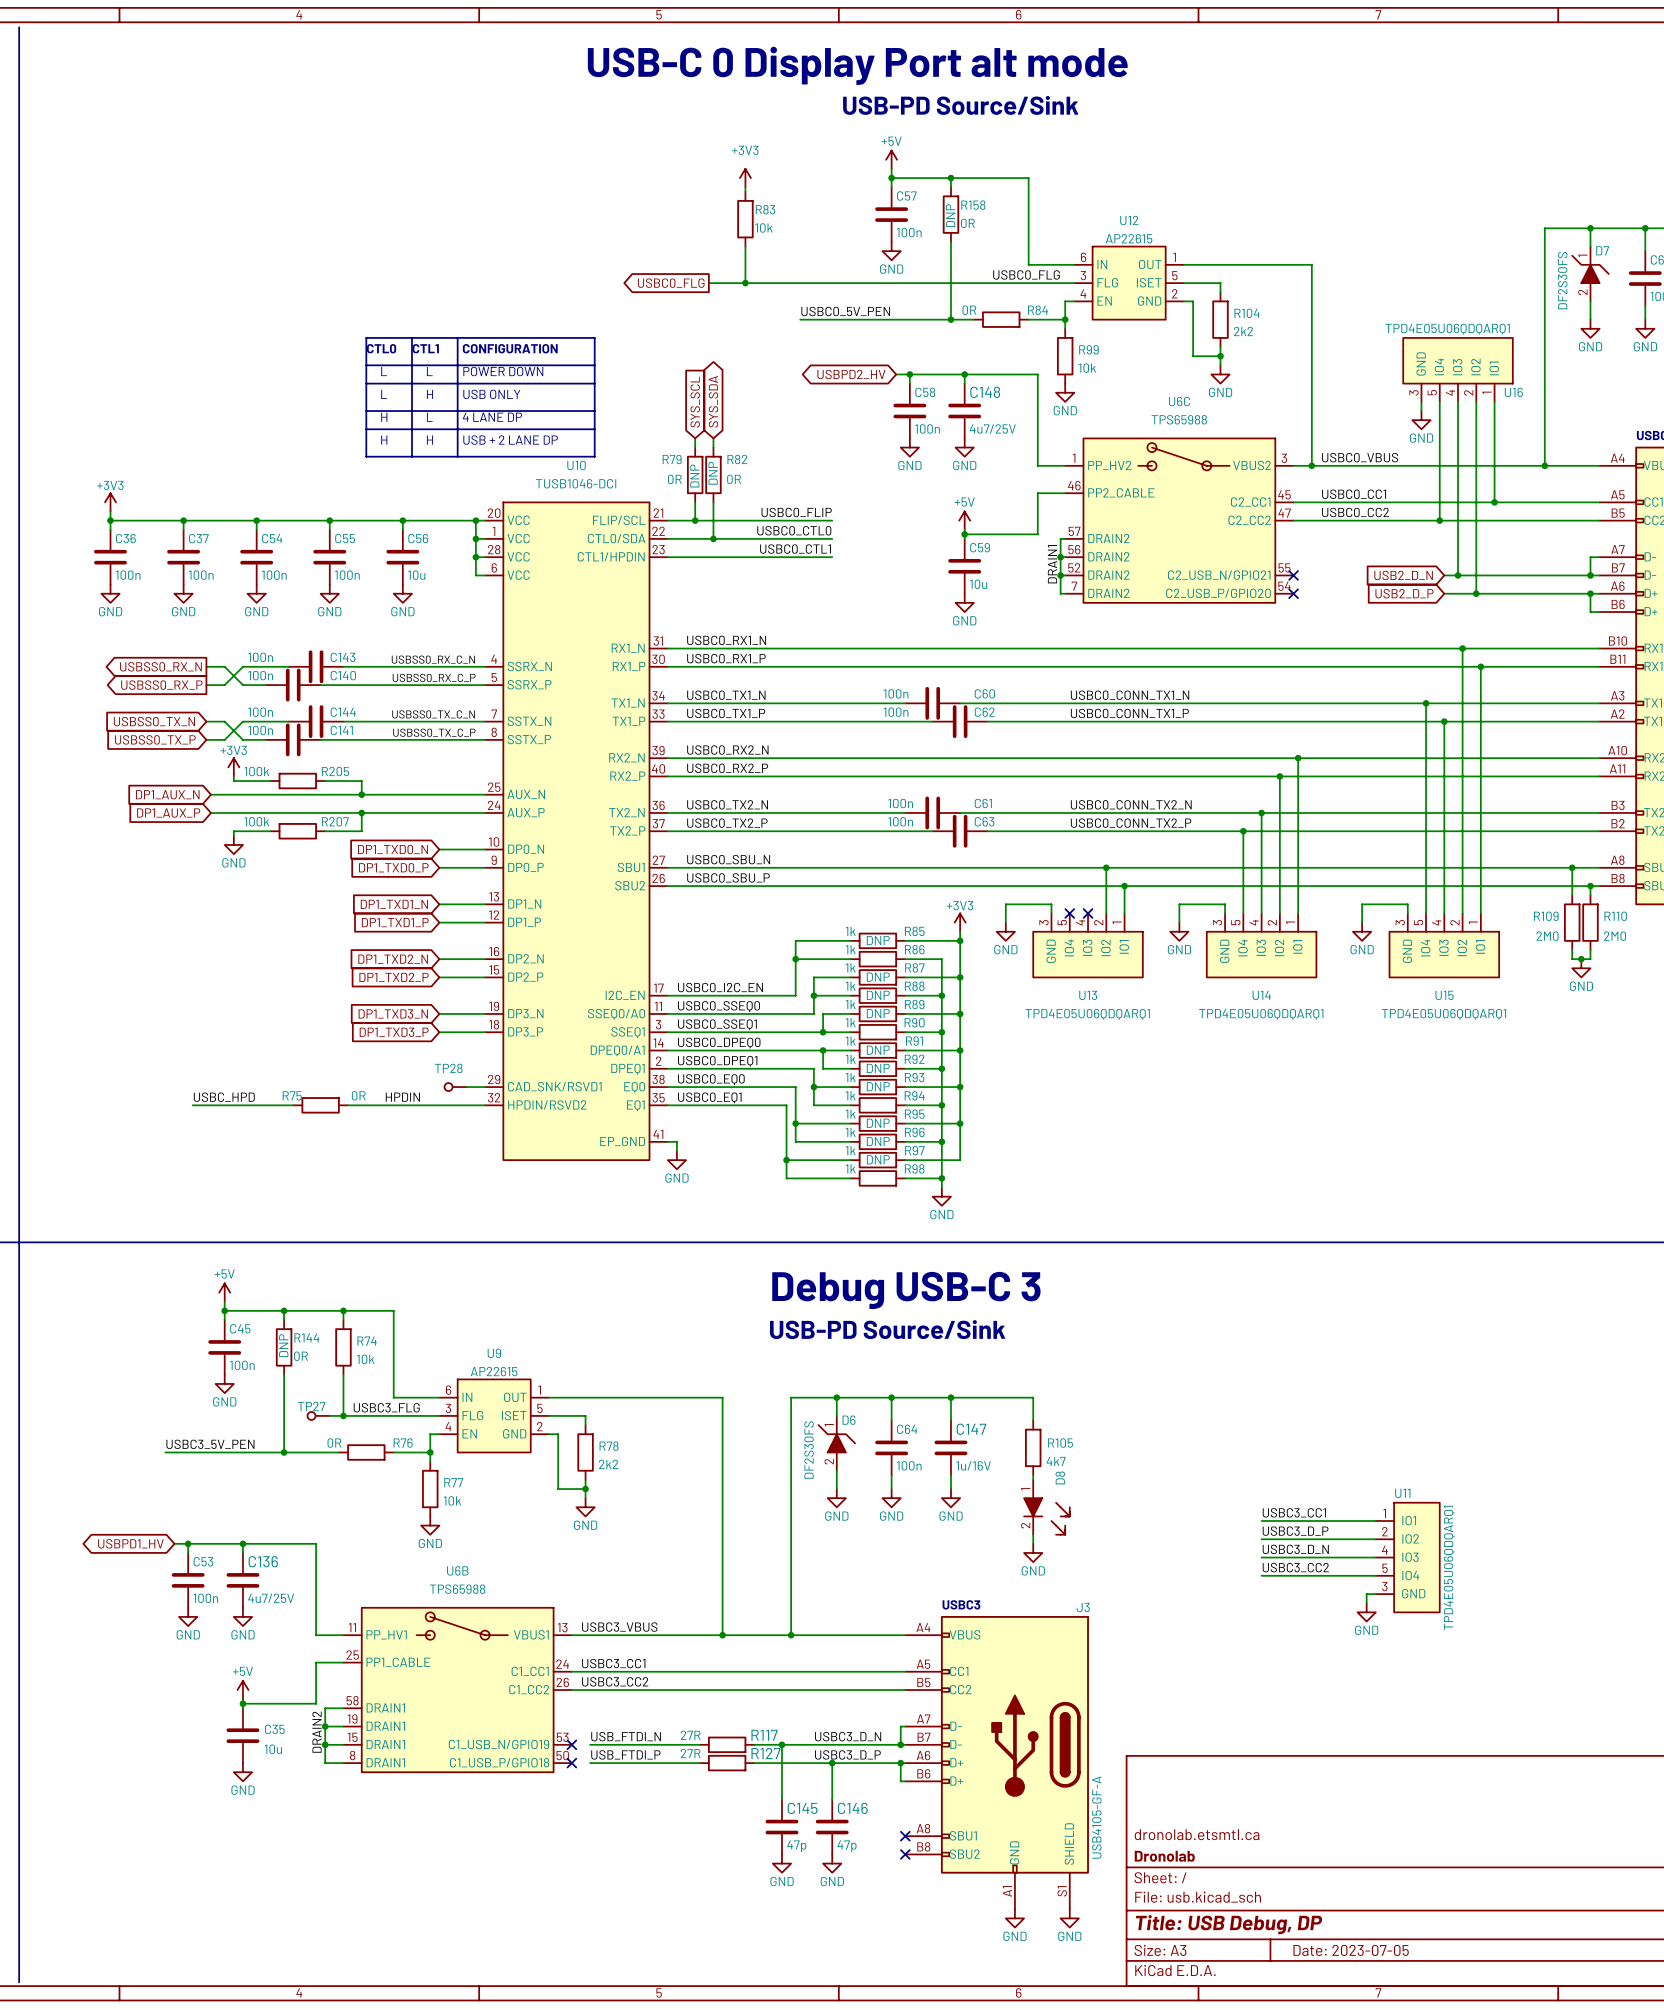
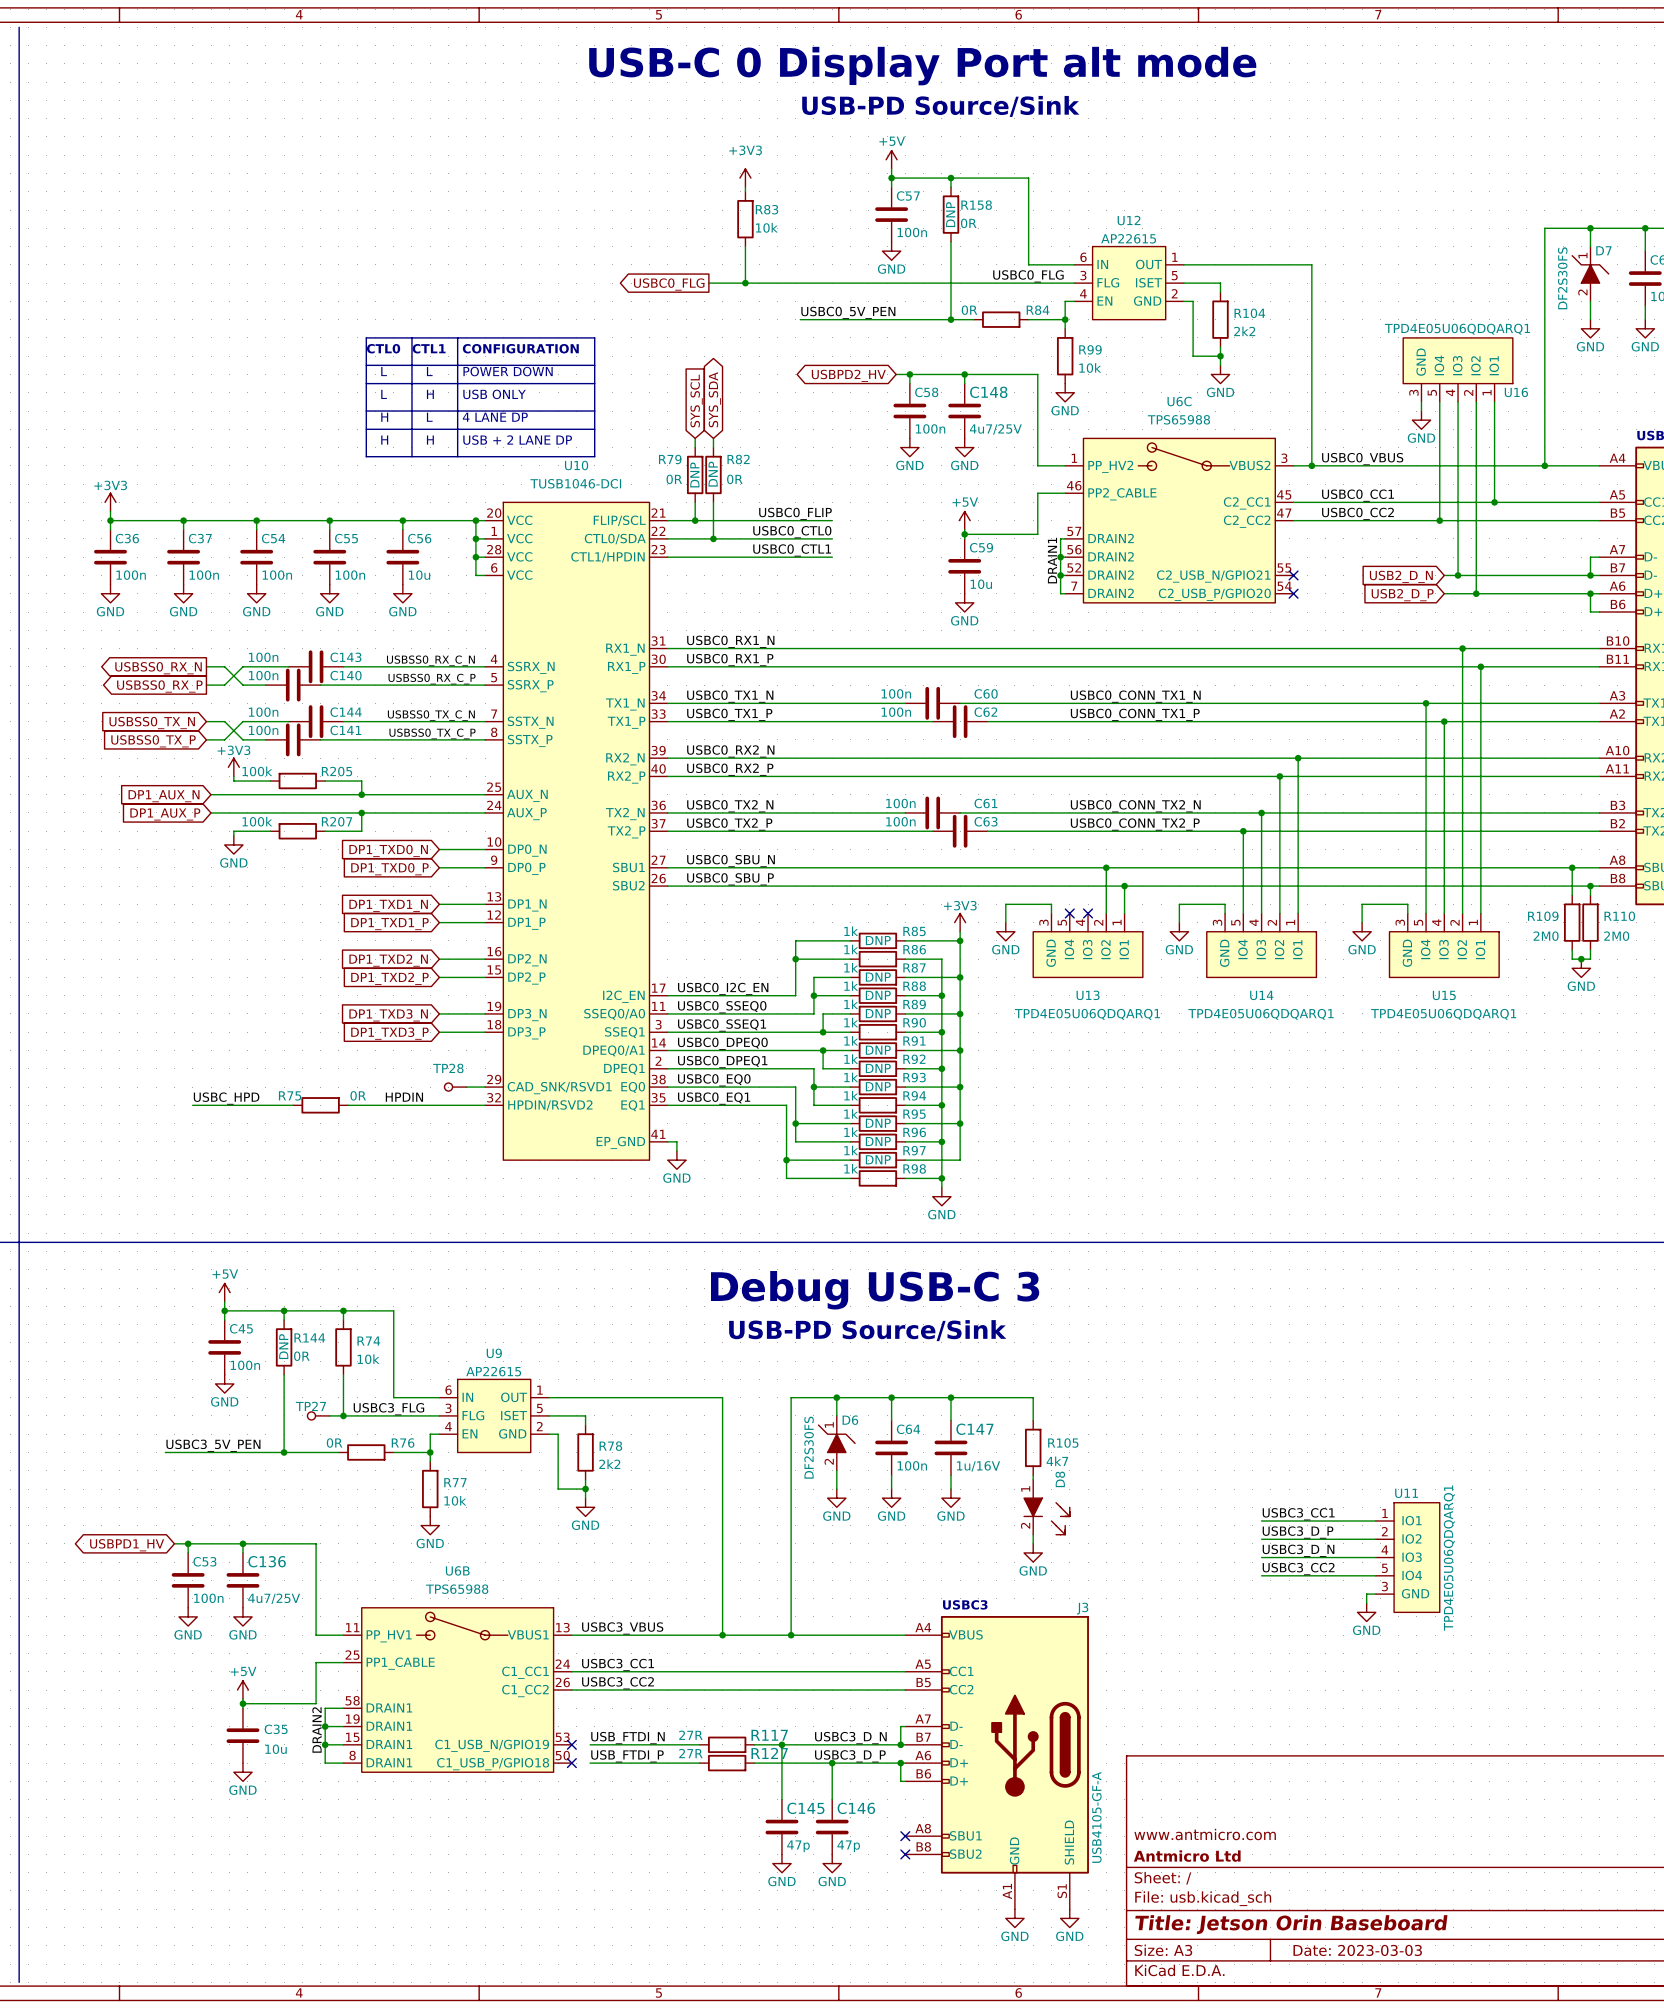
title block: dronolab.etsmtl.ca (1197, 1834) -> www.antmicro.com (1205, 1834)
title block: Dronolab (1164, 1856) -> Antmicro Ltd (1187, 1856)
title block: Title: USB Debug, DP (1229, 1924) -> Title: Jetson Orin Baseboard (1291, 1924)
title block: Date: 2023-07-05 (1351, 1950) -> Date: 2023-03-03 (1357, 1950)

